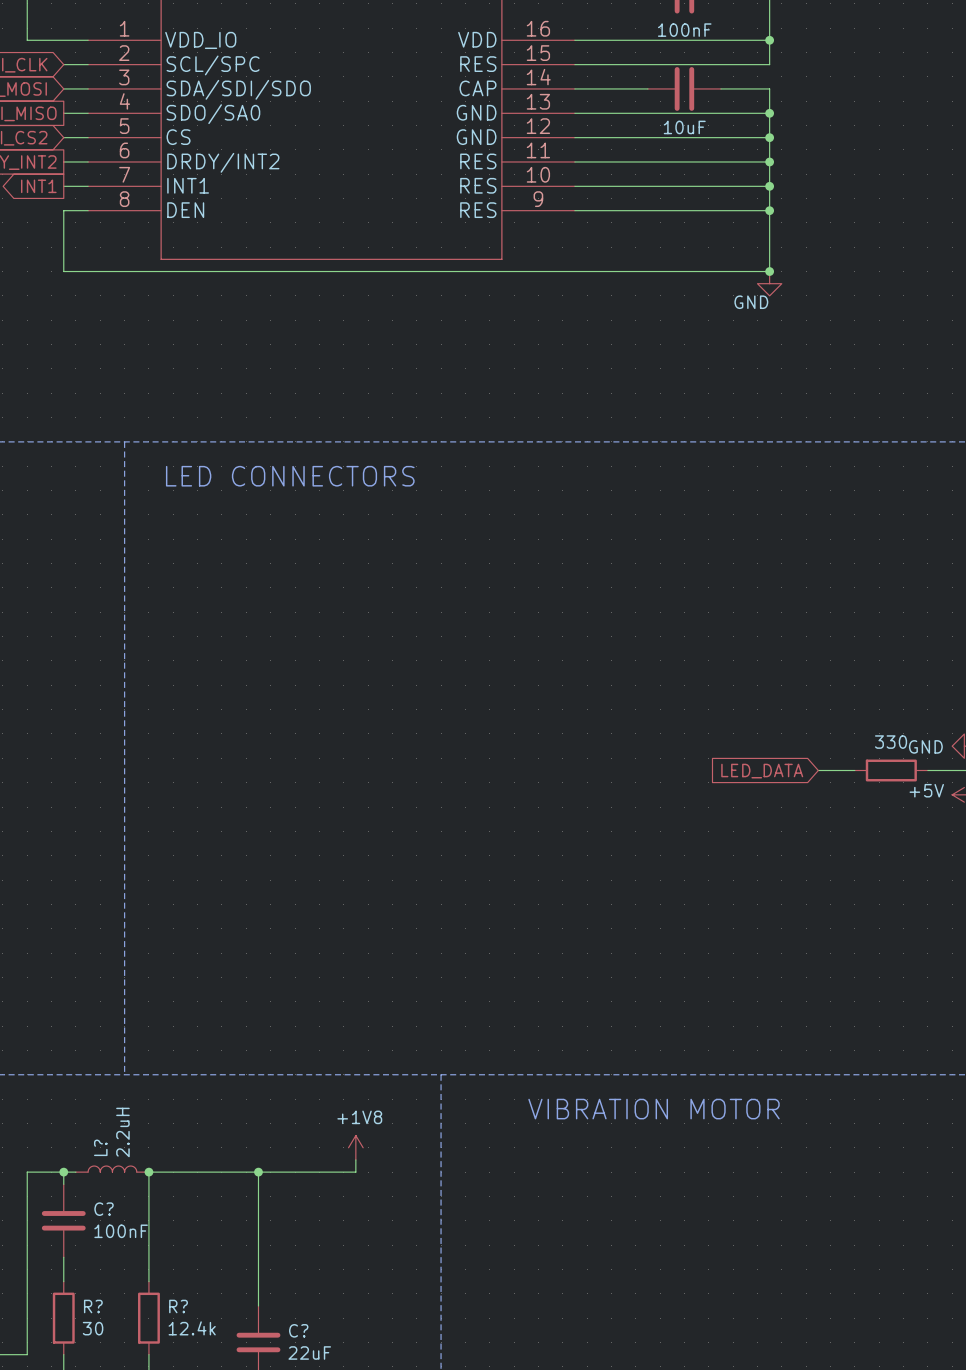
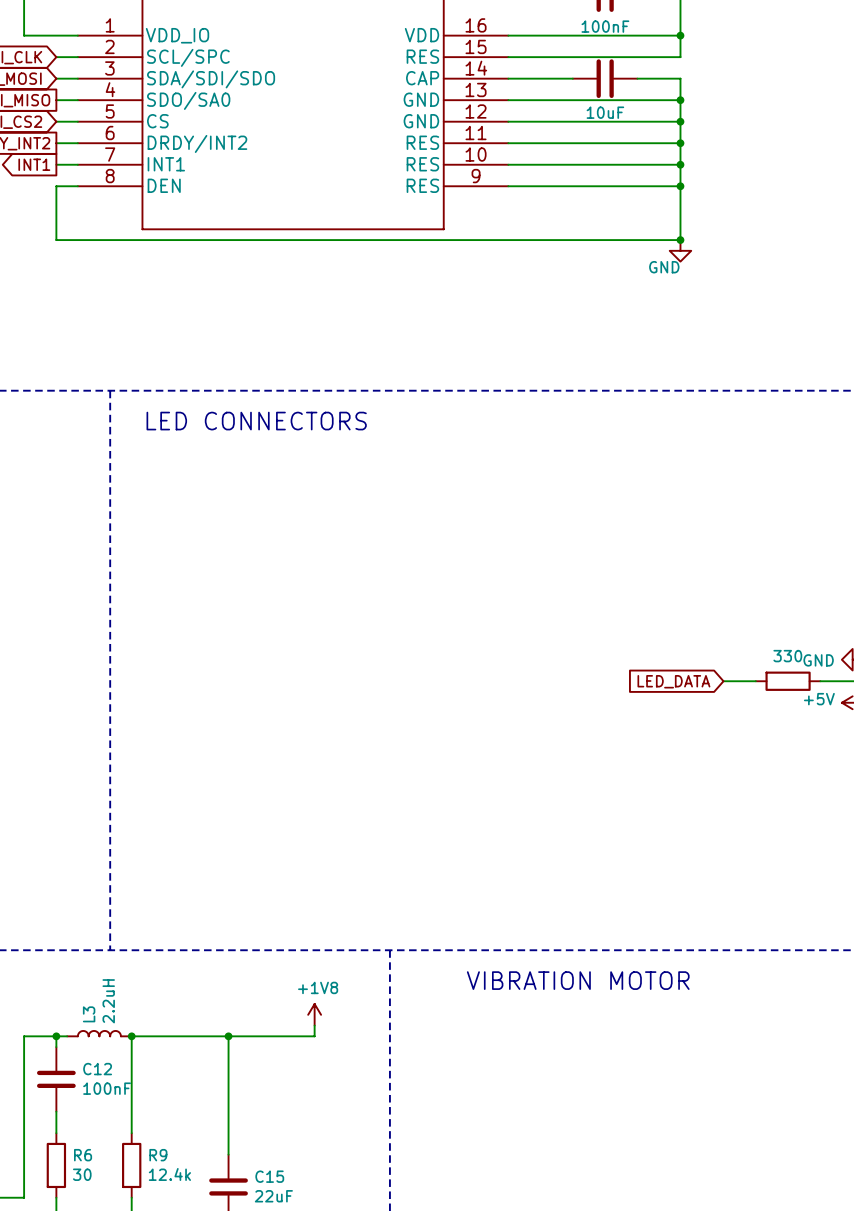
L? name: L? (100, 1147) -> L3 (89, 1014)
C? name: C? (104, 1209) -> C12 (97, 1069)
R? name: R? (93, 1306) -> R6 (83, 1155)
R? name: R? (178, 1306) -> R9 (158, 1155)
C? name: C? (298, 1330) -> C15 (269, 1176)

